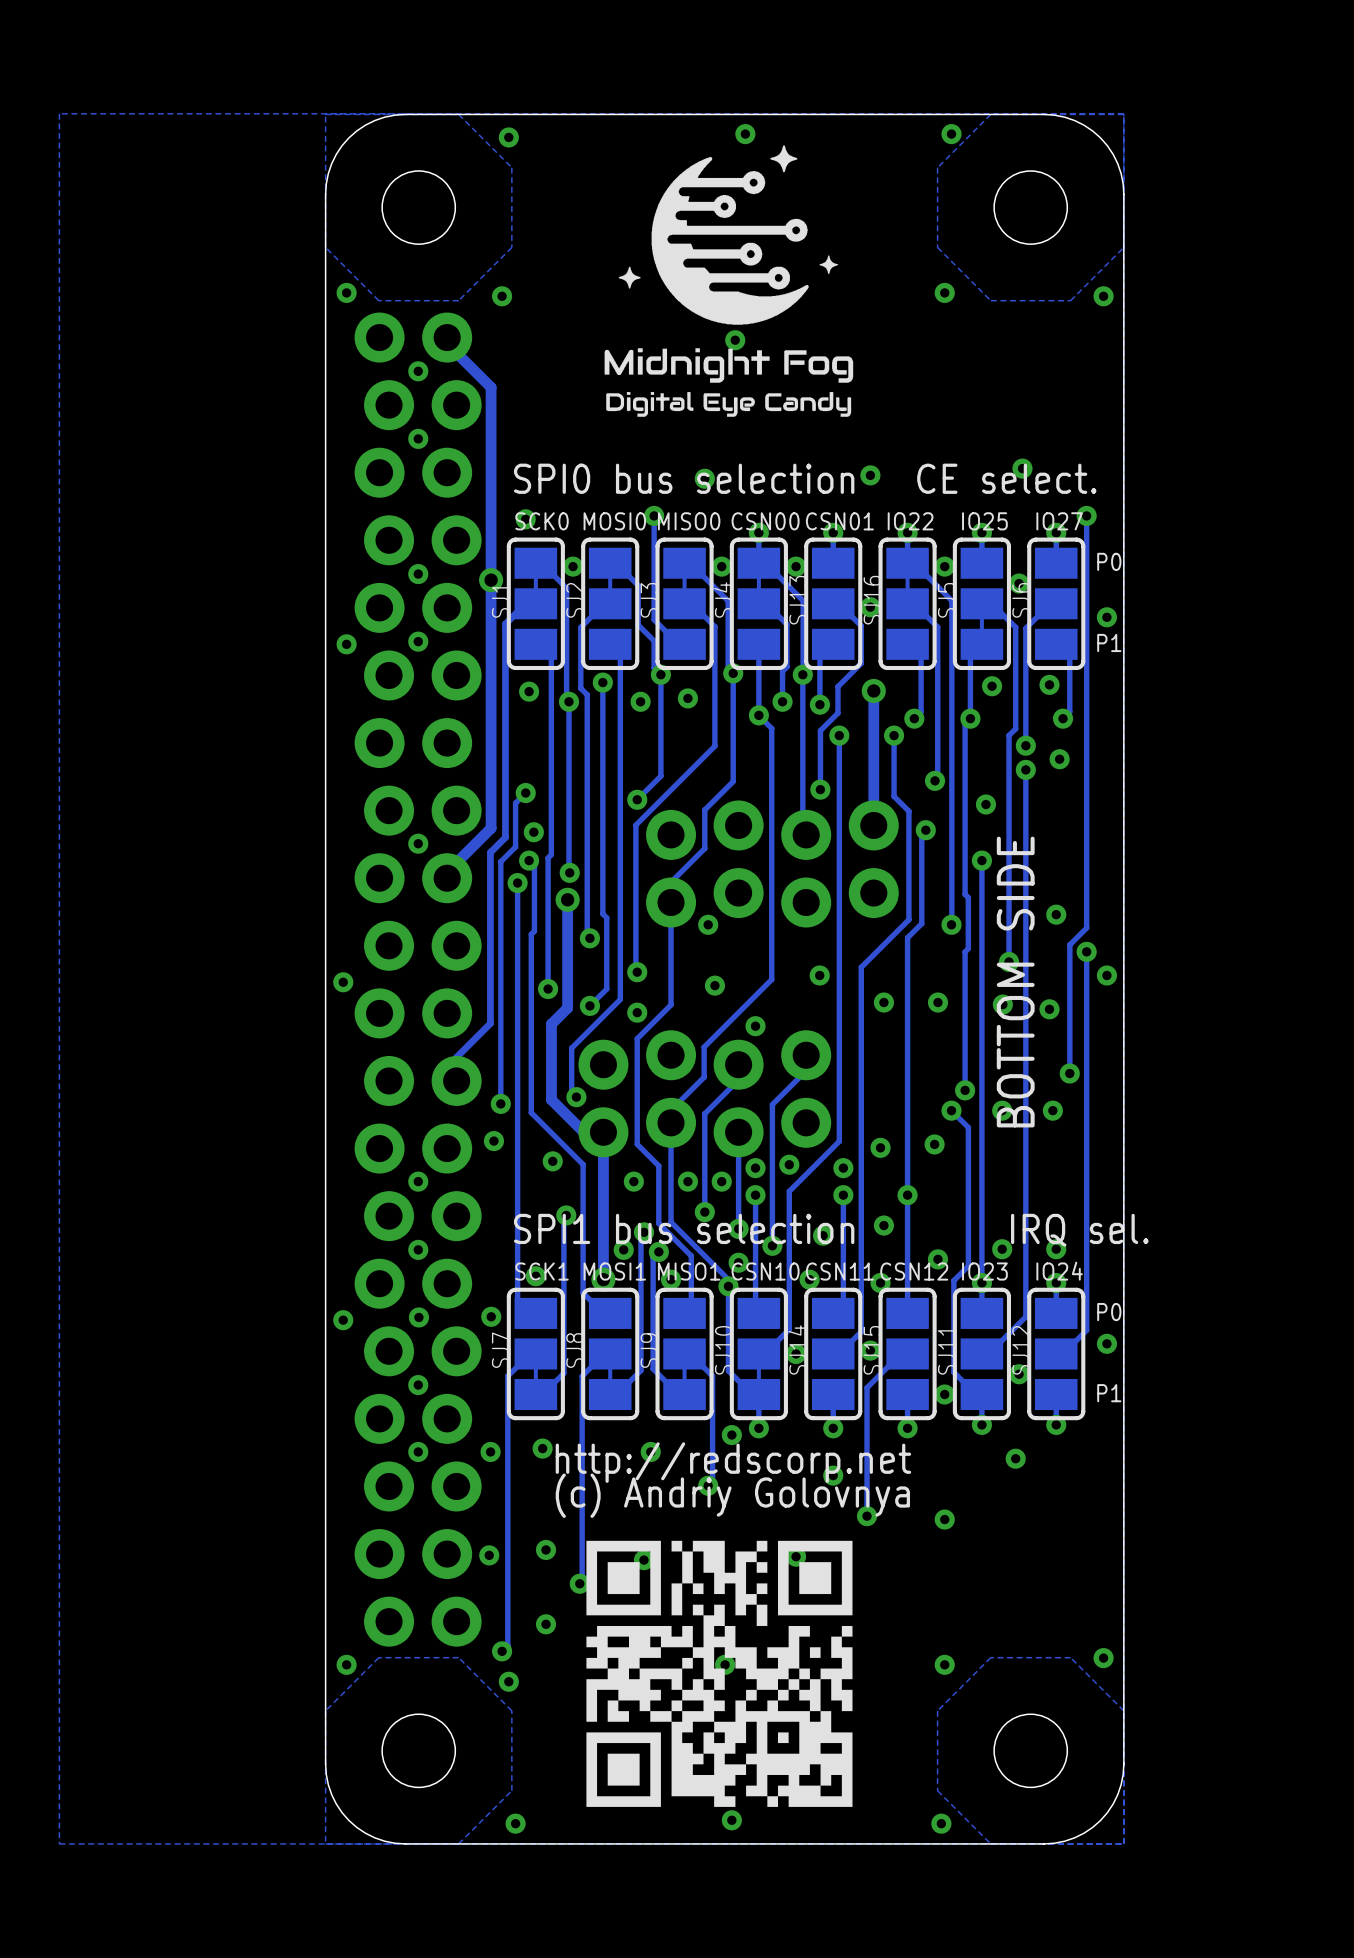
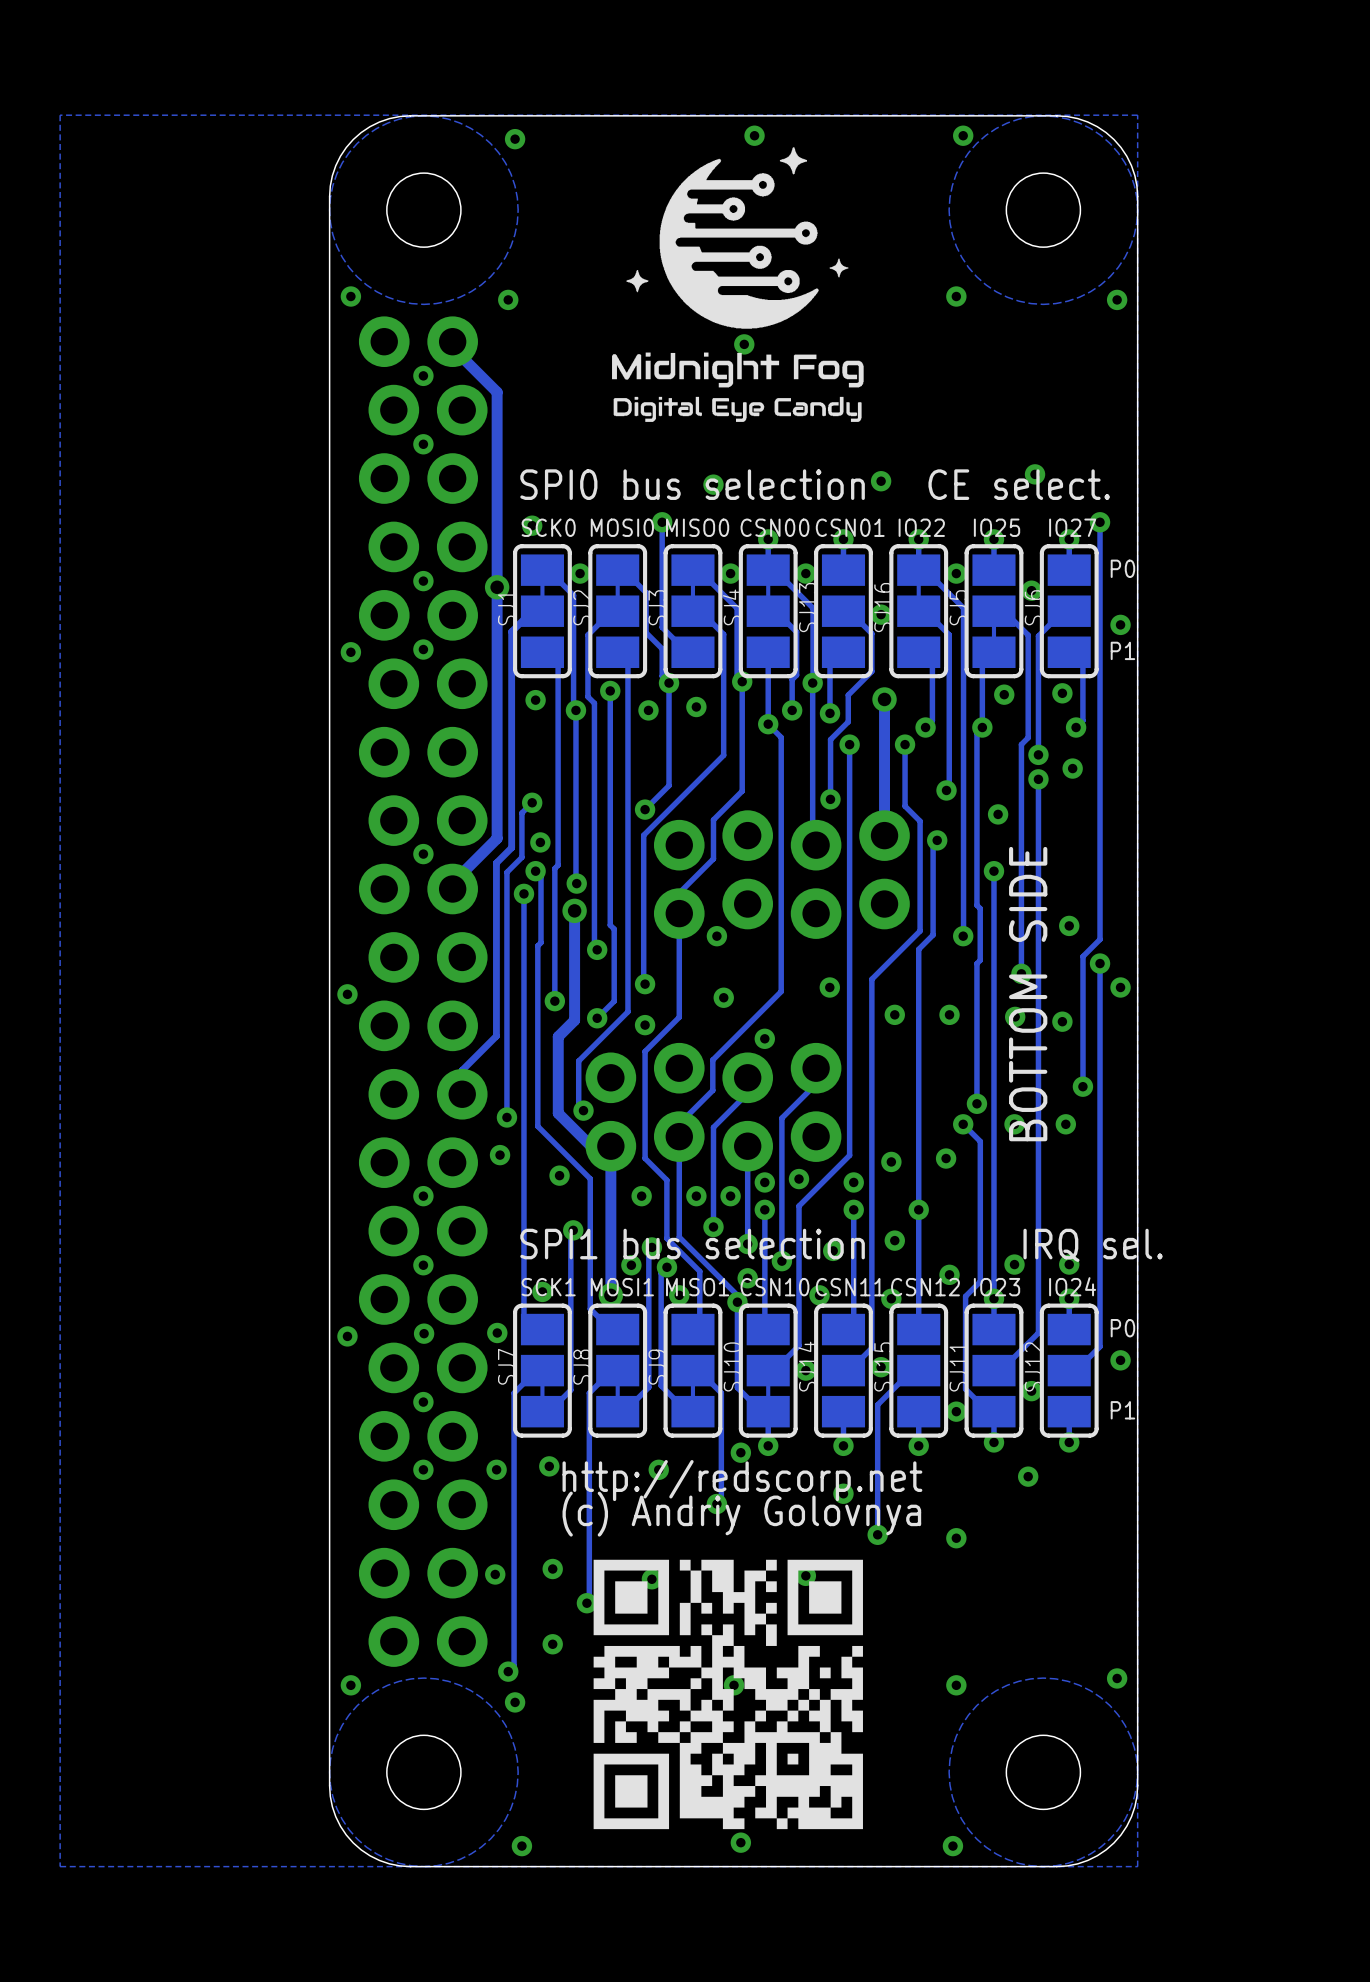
zone outline: (458, 114) (325, 114) (325, 247) (378, 300) (458, 300) (511, 247) (511, 167) (458, 114) -> (423, 115) (448, 119) (459, 123) (471, 128) (490, 143) (498, 152) (510, 174) (517, 197) (518, 210) (517, 222) (510, 246) (498, 267) (490, 276) (481, 284) (459, 297) (448, 301) (423, 304) (399, 301) (387, 297) (366, 284) (357, 276) (349, 267) (336, 246) (330, 222) (329, 210) (330, 197) (336, 174) (349, 152) (357, 143) (376, 128) (387, 123) (399, 119) (423, 115)
zone outline: none -> (1043, 115) (1067, 119) (1079, 123) (1090, 128) (1110, 143) (1118, 152) (1130, 174) (1136, 197) (1137, 210) (1136, 222) (1130, 246) (1118, 267) (1110, 276) (1100, 284) (1079, 297) (1067, 301) (1043, 304) (1018, 301) (1007, 297) (985, 284) (976, 276) (968, 267) (956, 246) (949, 222) (949, 210) (949, 197) (956, 174) (968, 152) (976, 143) (996, 128) (1007, 123) (1018, 119) (1043, 115)
zone outline: (1123, 114) (990, 114) (937, 167) (937, 247) (990, 300) (1070, 300) (1123, 247) -> none
zone outline: none -> (423, 1678) (436, 1678) (459, 1685) (481, 1697) (490, 1705) (498, 1714) (510, 1736) (517, 1760) (518, 1772) (517, 1784) (510, 1808) (505, 1819) (490, 1839) (481, 1847) (459, 1859) (436, 1865) (423, 1866) (411, 1865) (387, 1859) (366, 1847) (357, 1839) (349, 1829) (336, 1808) (330, 1784) (329, 1772) (330, 1760) (336, 1736) (342, 1725) (357, 1705) (366, 1697) (387, 1685) (399, 1681) (423, 1678)
zone outline: none -> (1043, 1678) (1067, 1681) (1079, 1685) (1100, 1697) (1110, 1705) (1118, 1714) (1130, 1736) (1136, 1760) (1137, 1772) (1136, 1784) (1130, 1808) (1118, 1829) (1110, 1839) (1100, 1847) (1079, 1859) (1055, 1865) (1043, 1866) (1018, 1863) (1007, 1859) (996, 1853) (976, 1839) (968, 1829) (956, 1808) (952, 1796) (949, 1772) (949, 1760) (956, 1736) (968, 1714) (976, 1705) (996, 1690) (1007, 1685) (1018, 1681) (1043, 1678)
zone outline: (1123, 1710) (1070, 1657) (990, 1657) (937, 1710) (937, 1790) (990, 1843) -> none
zone outline: (458, 1843) (511, 1790) (511, 1710) (458, 1657) (378, 1657) (325, 1710) (325, 1843) -> none

